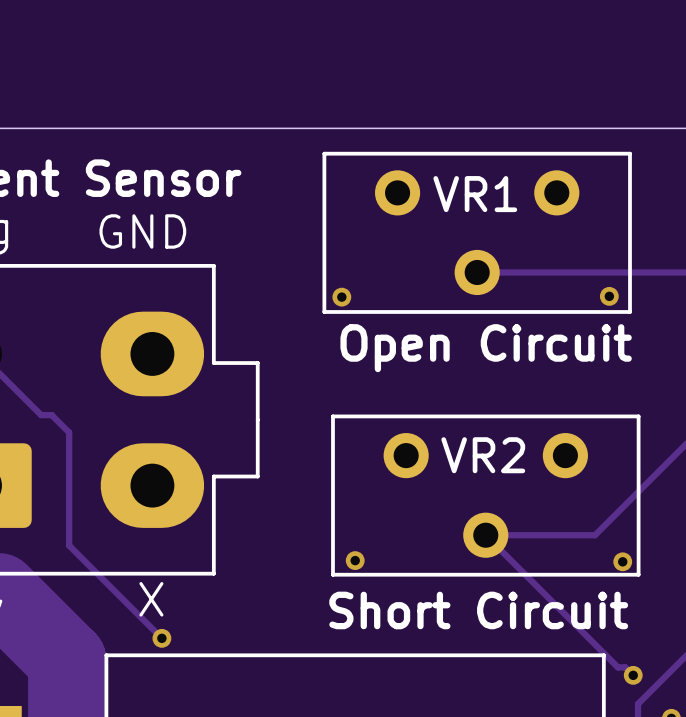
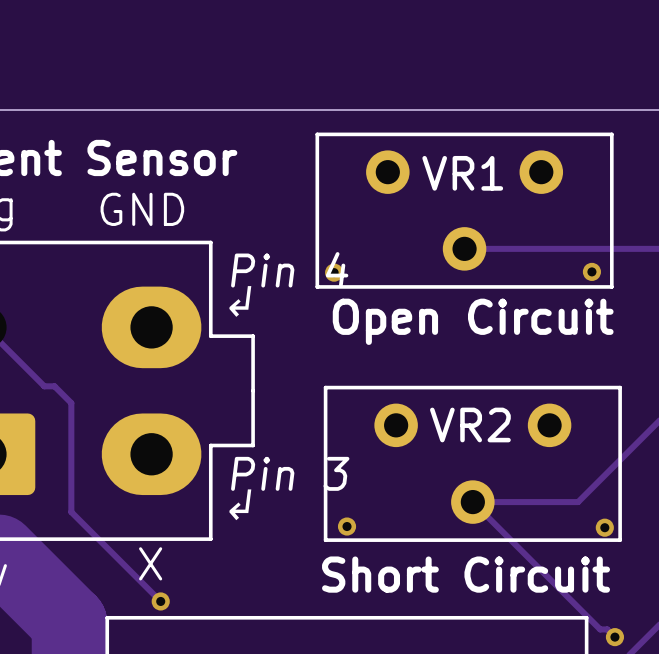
part text: none -> Pin 4 (289, 269)
part text: none -> ↲ (240, 301)
part text: none -> Pin 3 (290, 473)
part text: none -> ↲ (240, 504)

